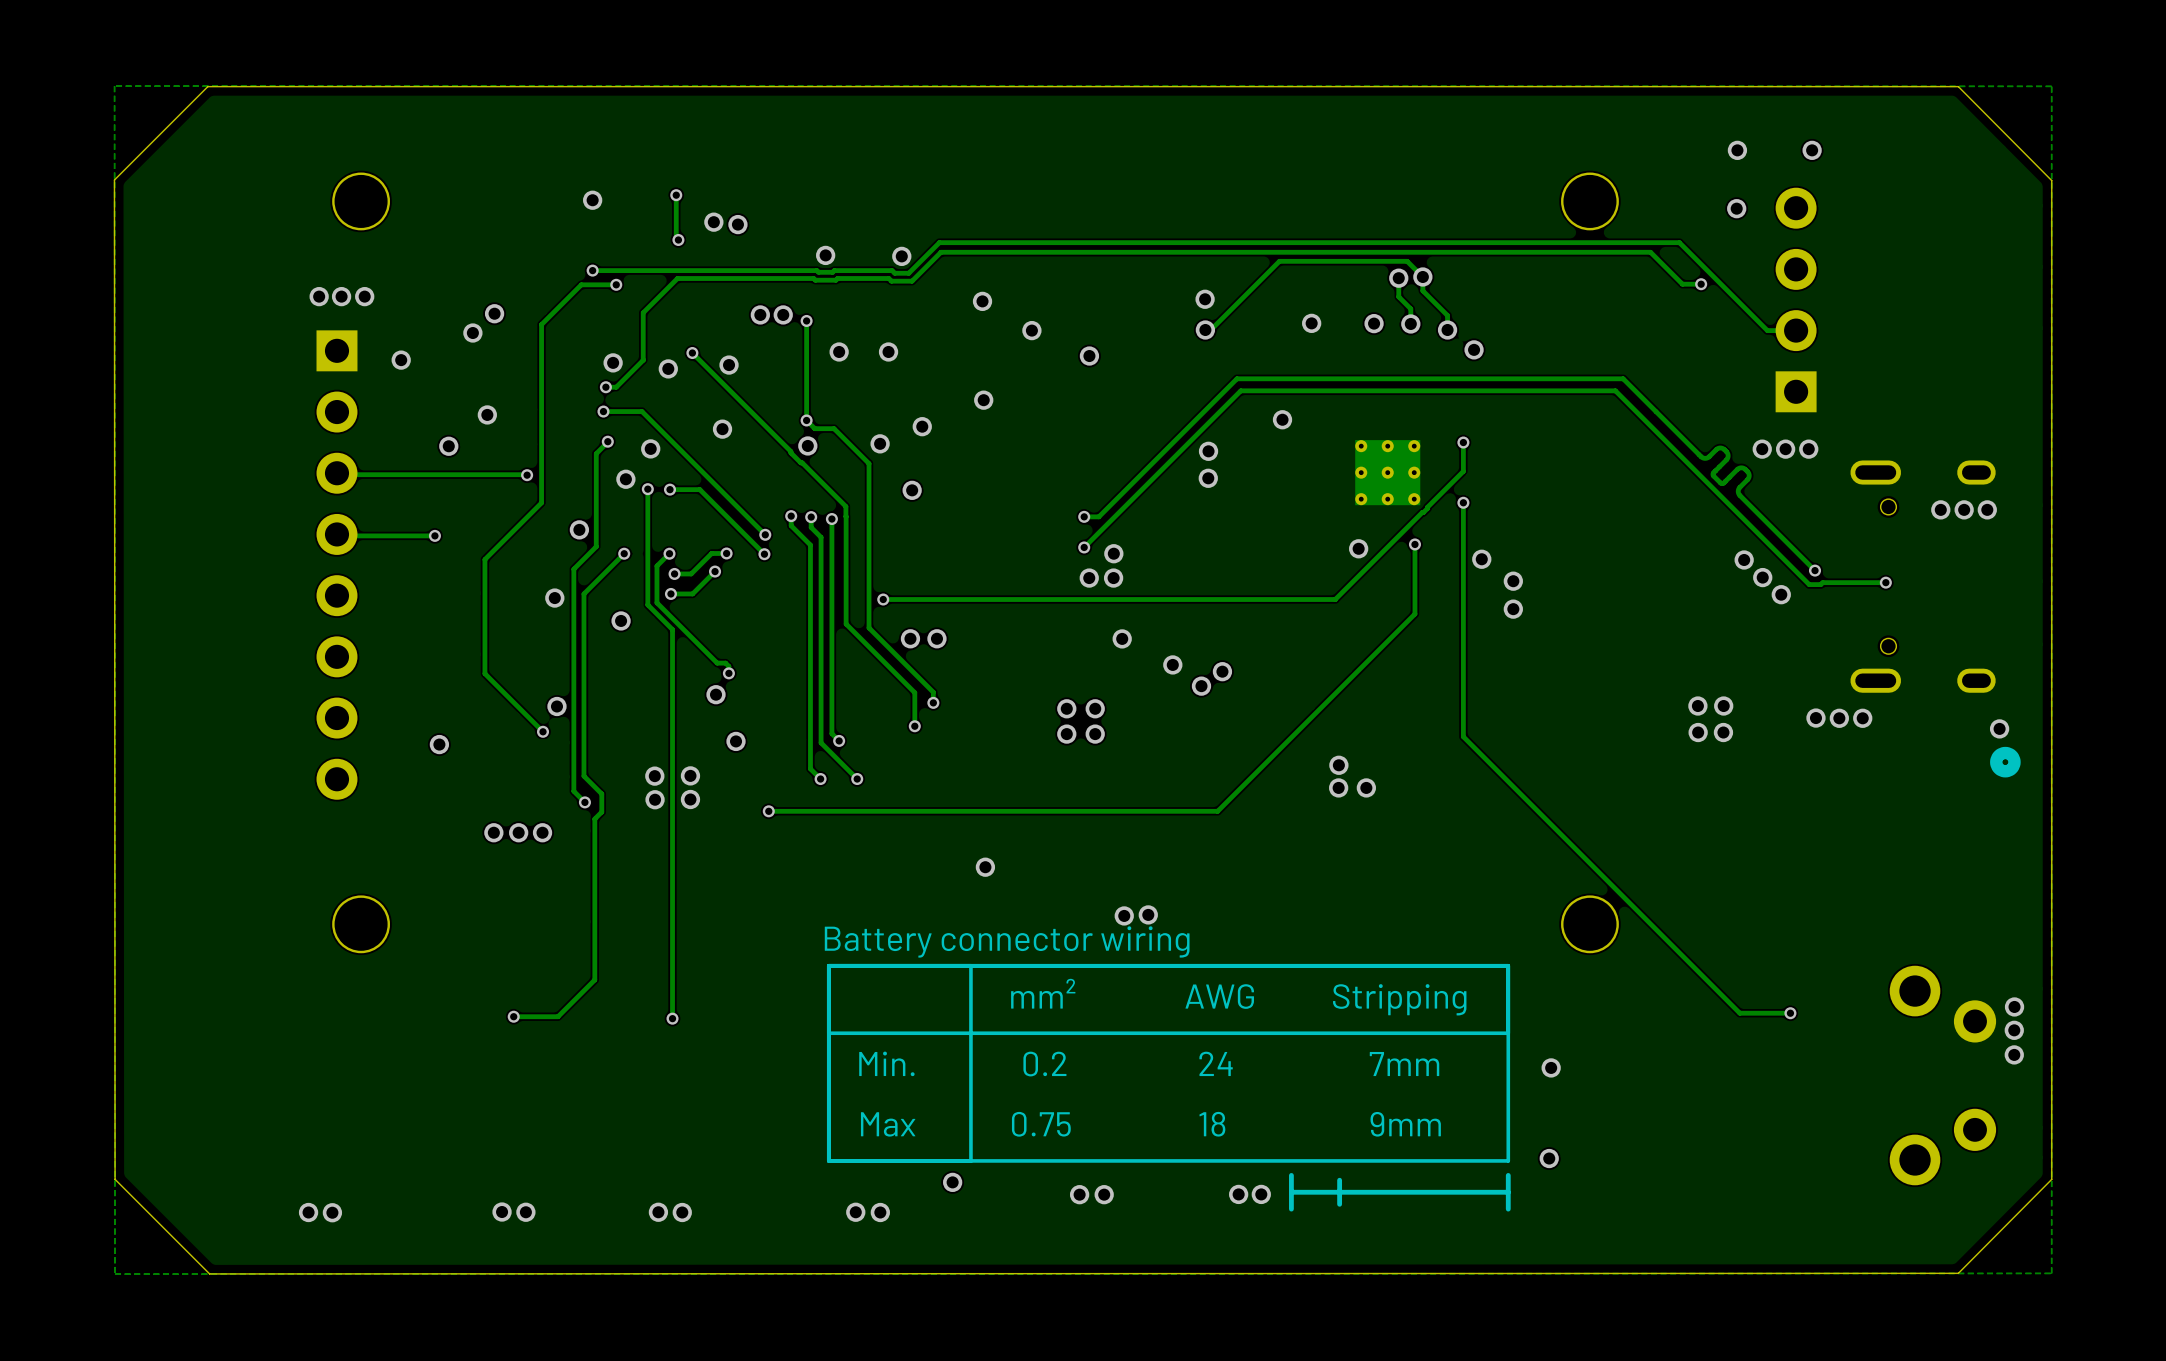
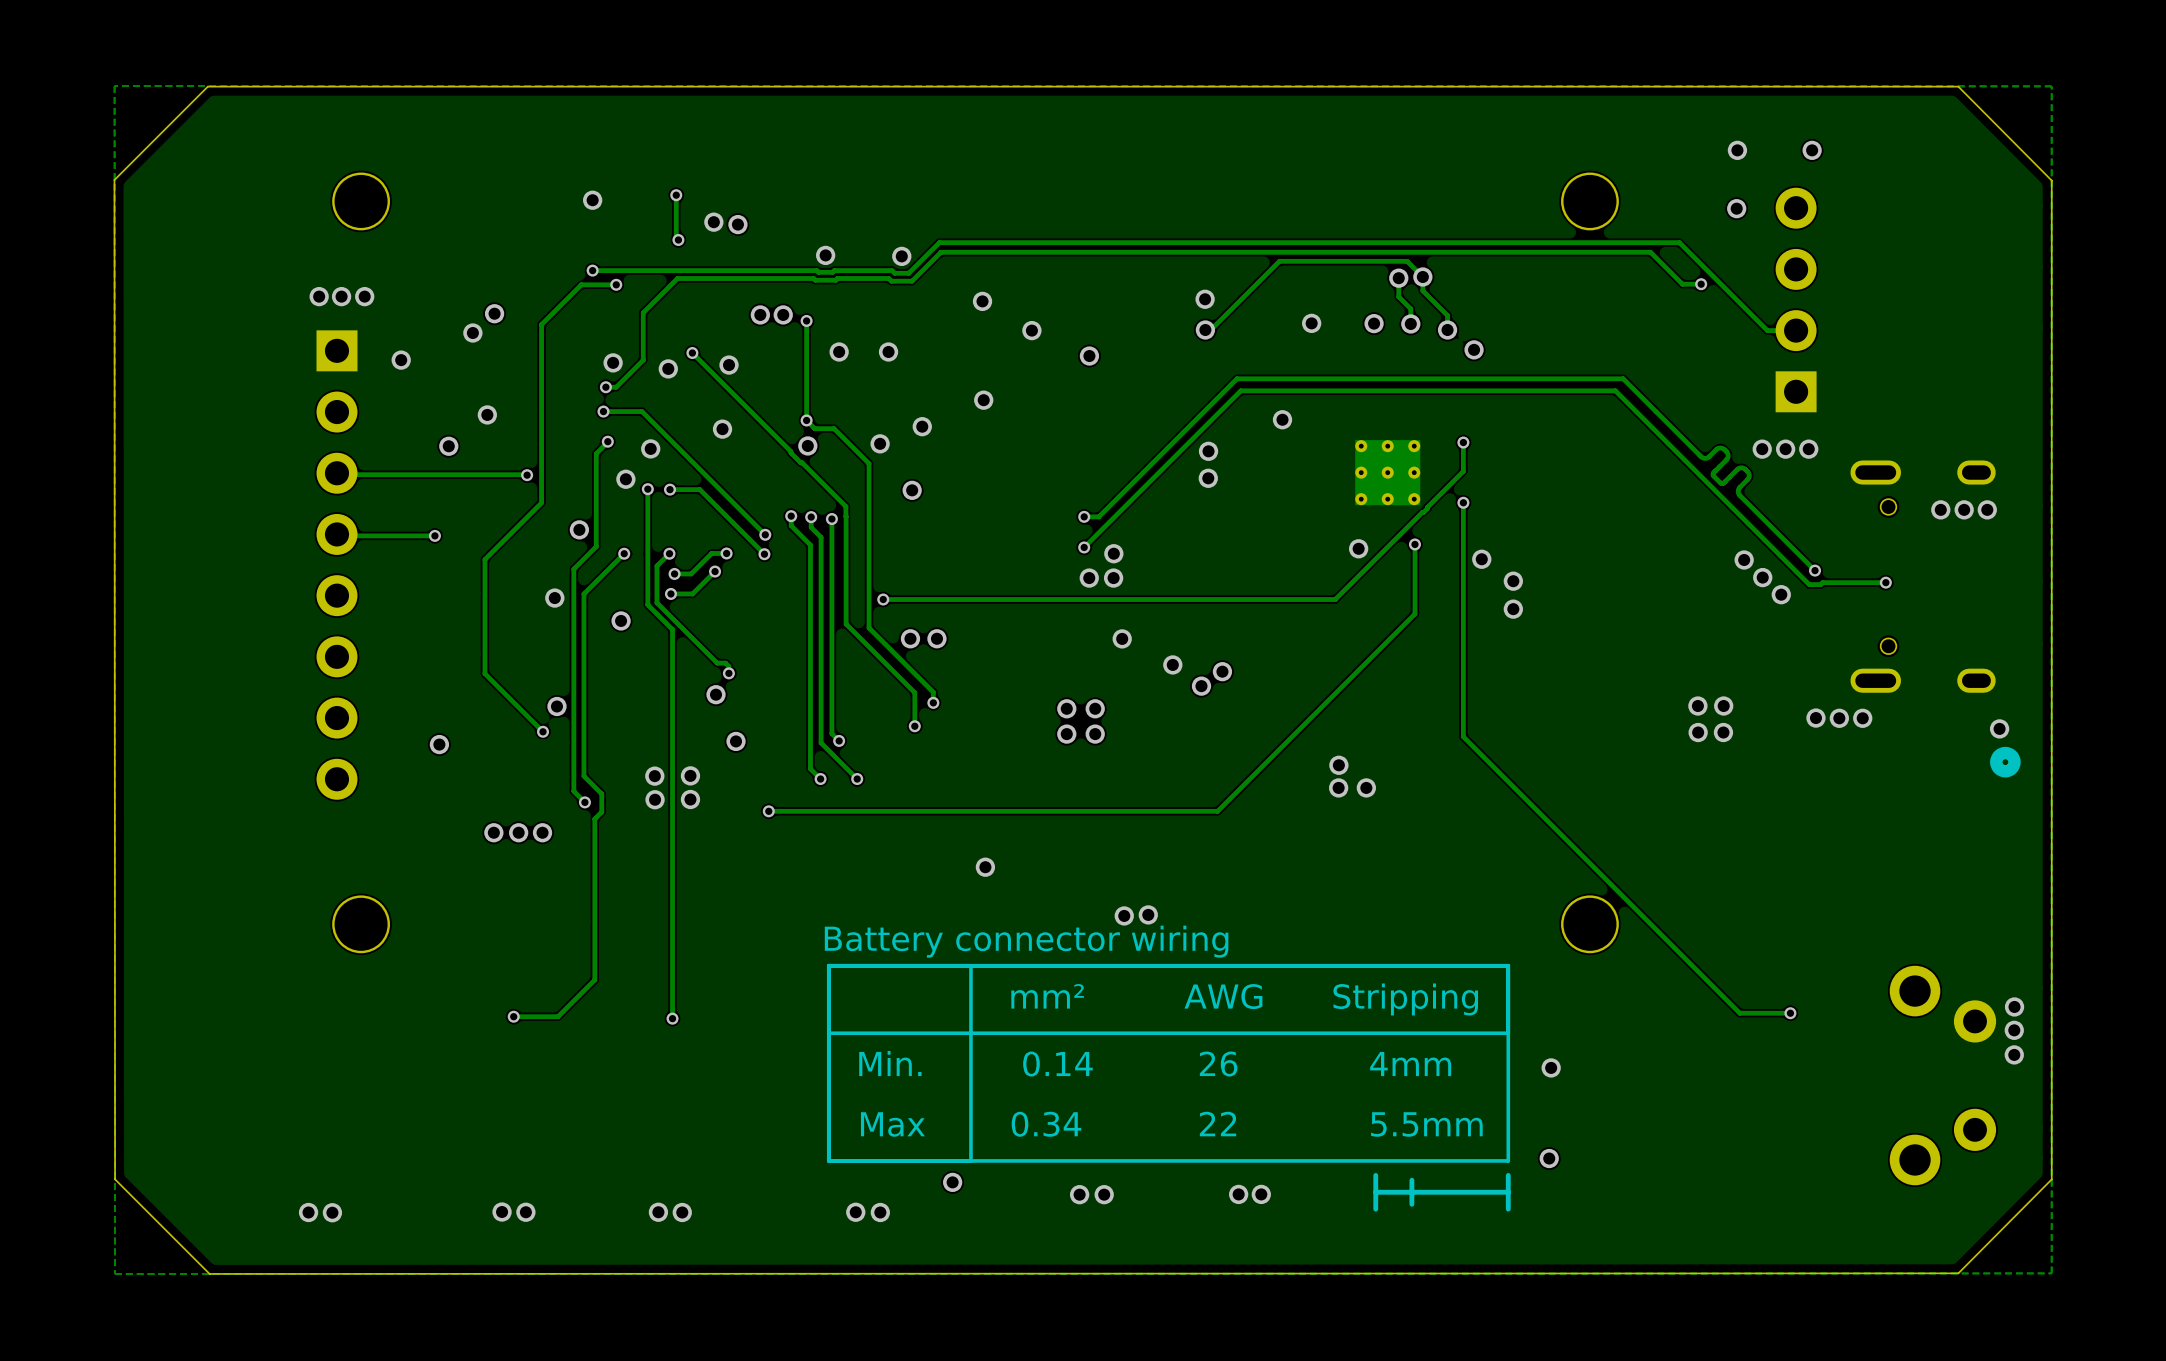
text: 24 (1216, 1063) -> 26 (1218, 1064)
text: 0.2 (1044, 1064) -> 0.14 (1057, 1064)
text: 7mm (1404, 1064) -> 4mm (1410, 1064)
text: 0.75 (1041, 1124) -> 0.34 (1046, 1124)
text: 18 (1212, 1124) -> 22 (1218, 1124)
text: 9mm (1405, 1124) -> 5.5mm (1426, 1124)
line: (1291, 1175) (1291, 1209) -> (1375, 1175) (1375, 1209)
line: (1339, 1180) (1339, 1204) -> (1411, 1180) (1411, 1204)
line: (1375, 1192) (1291, 1192) -> none

